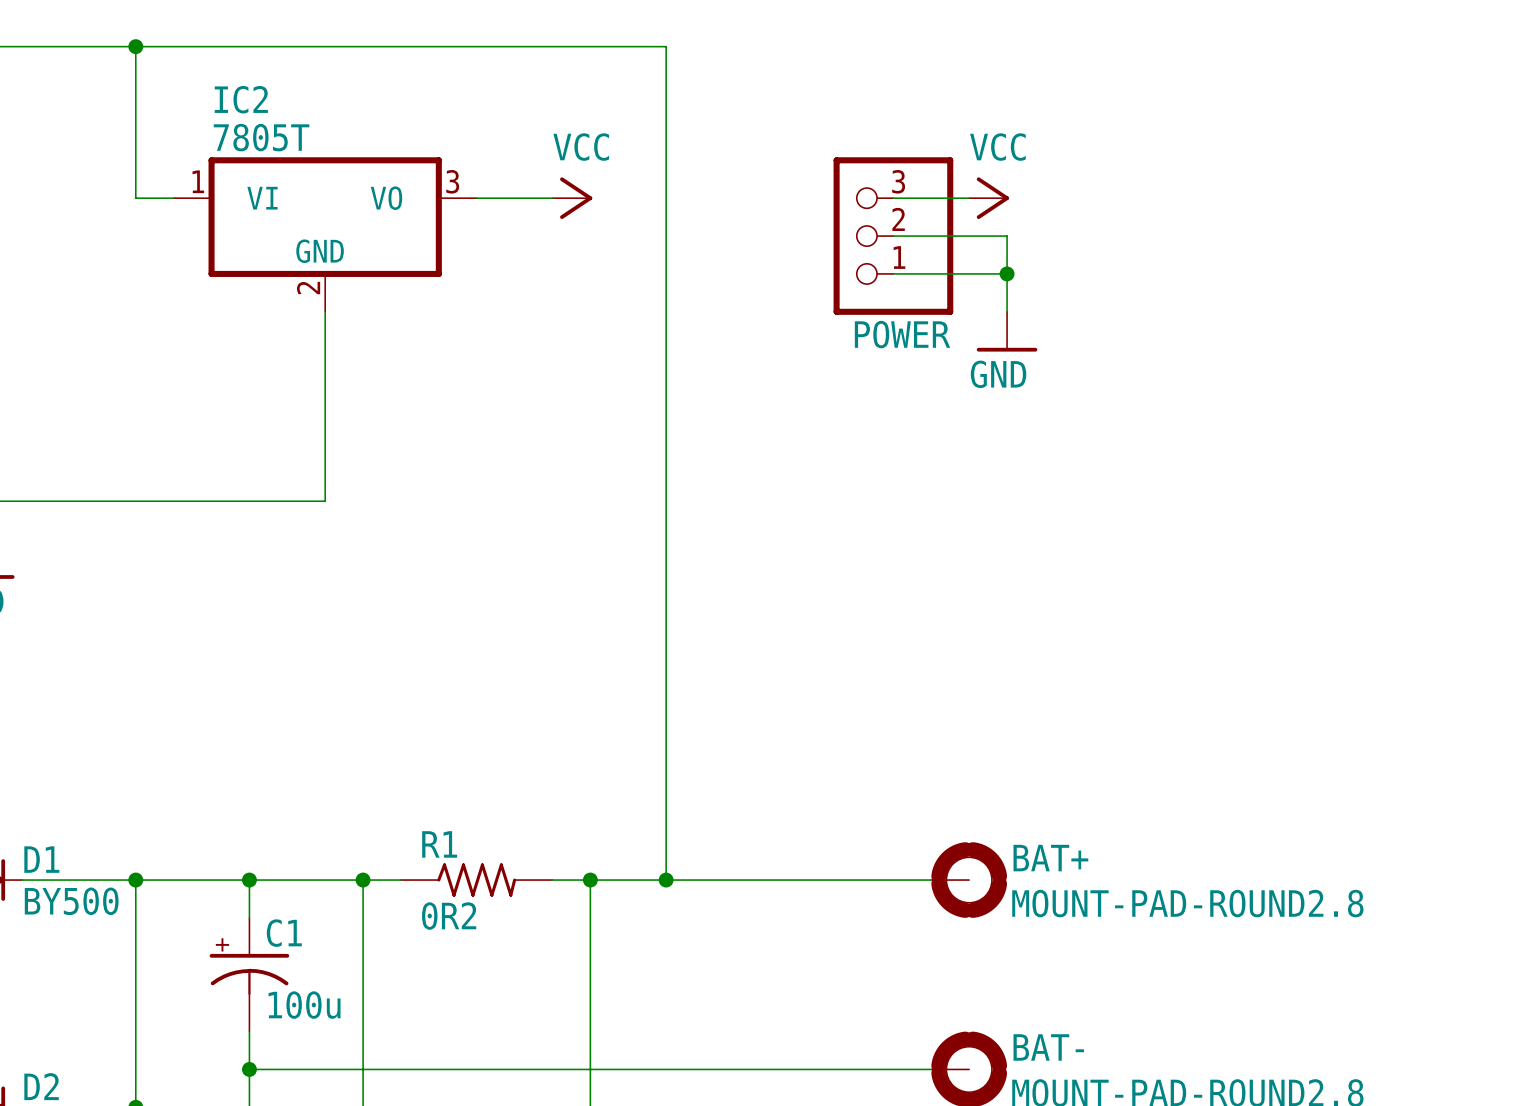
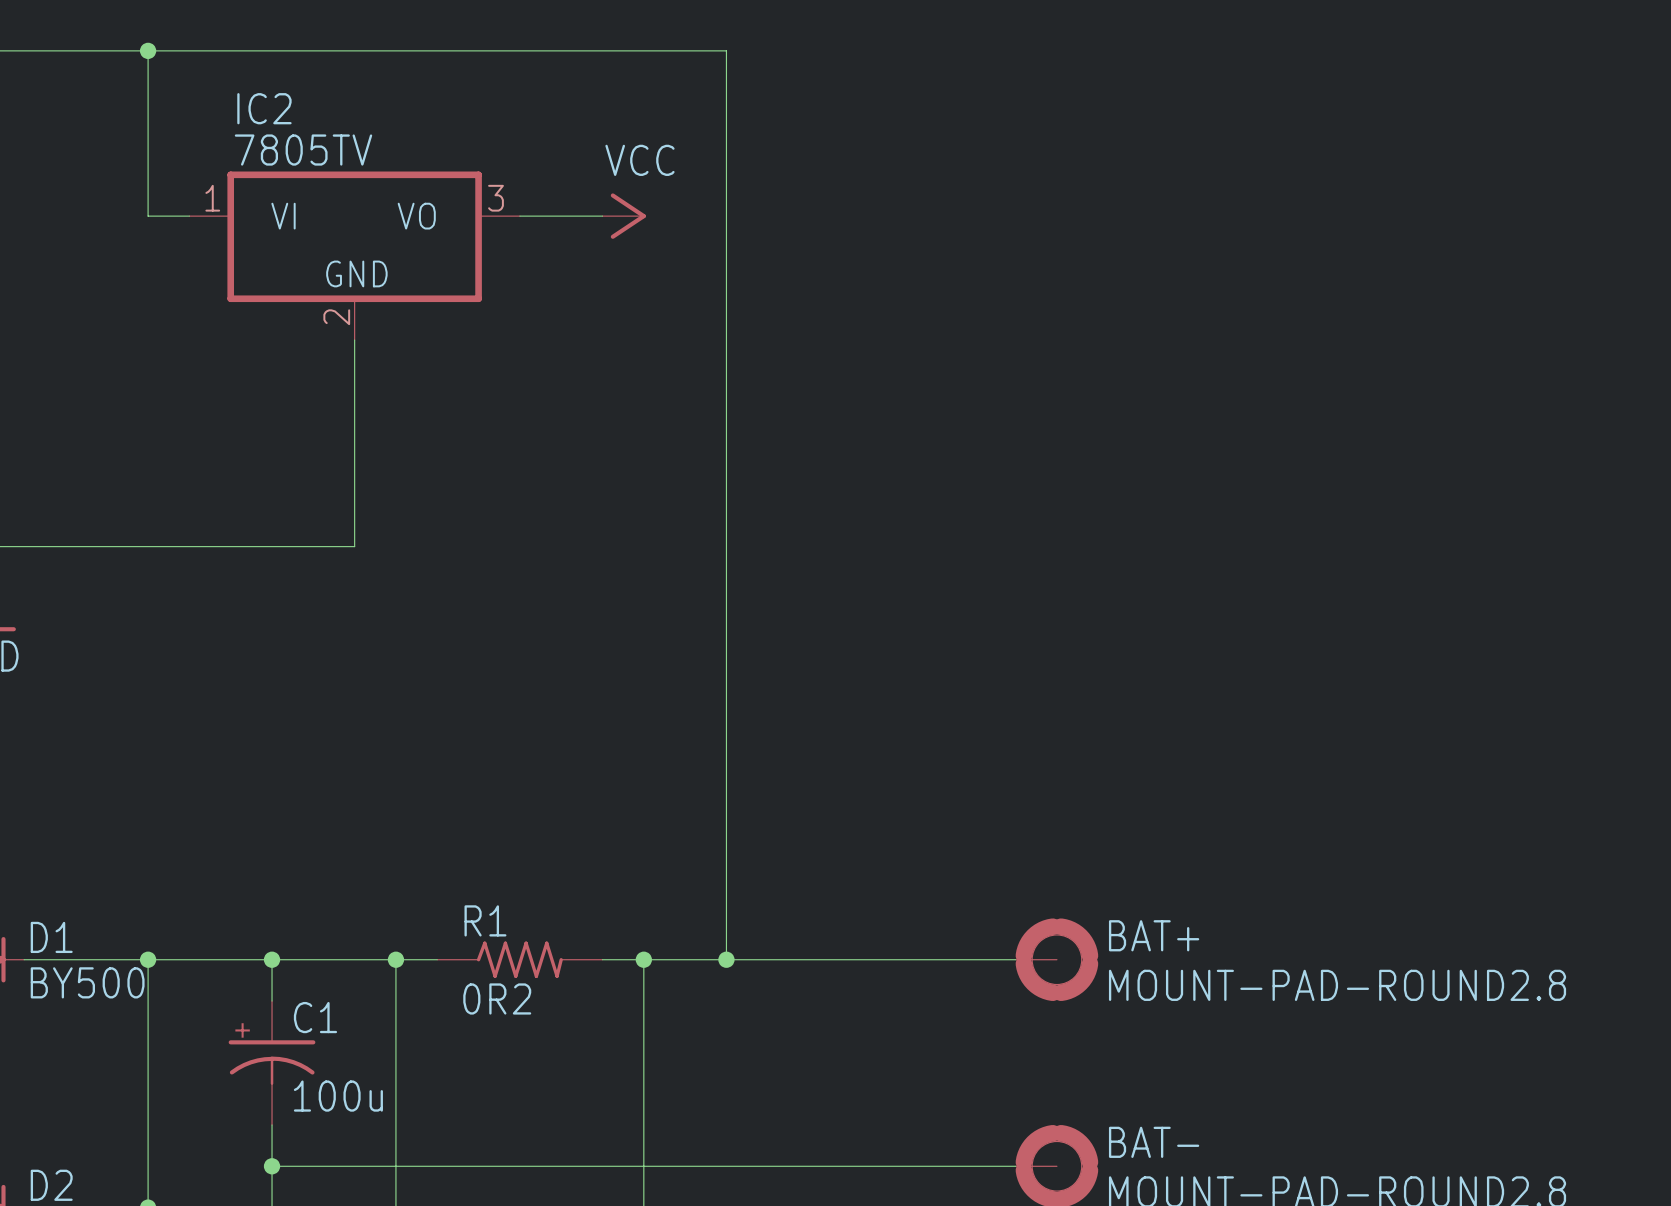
IC2 value: 7805T (261, 137) -> 7805TV (303, 150)
wire: (893, 198) (969, 198) -> none
power symbol: VCC (989, 198) -> none
wire: (893, 236) (1007, 236) (1007, 311) -> none
POWER: (893, 236) -> none
wire: (893, 273) (1007, 273) -> none
junction: (1007, 273) -> none
power symbol: GND (1007, 331) -> none

